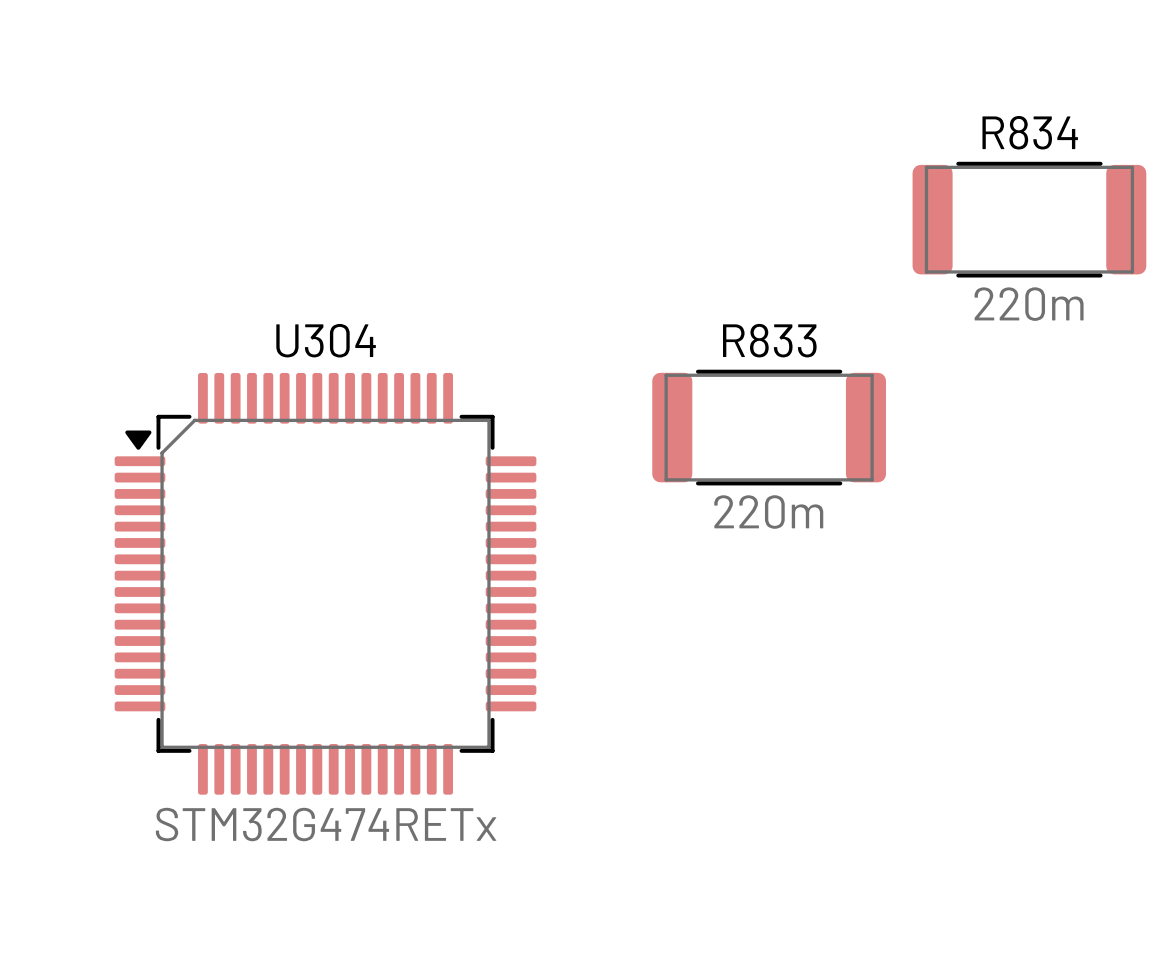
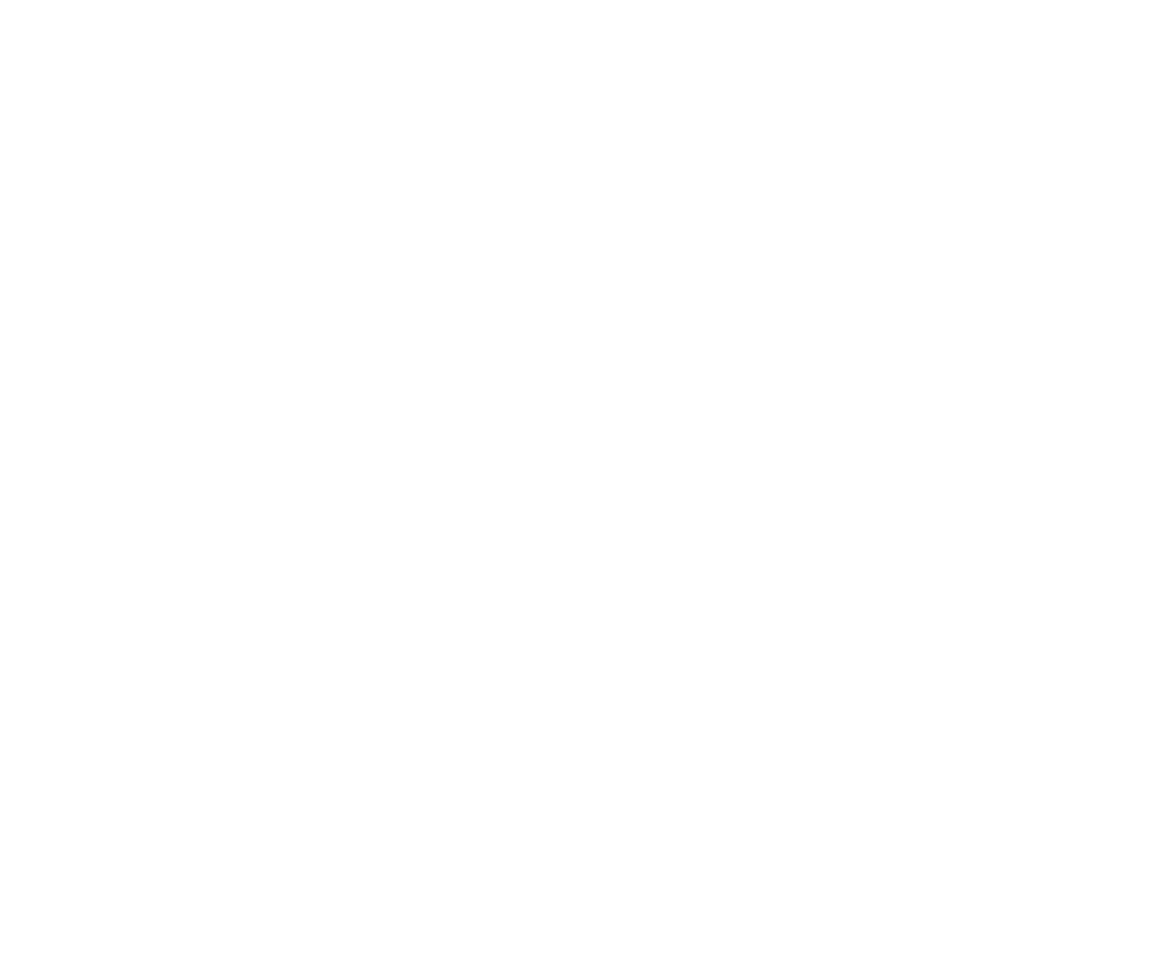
R834: 220m (1029, 219) -> none
R833: 220m (769, 427) -> none
U304: STM32G474RETx (325, 583) -> none

